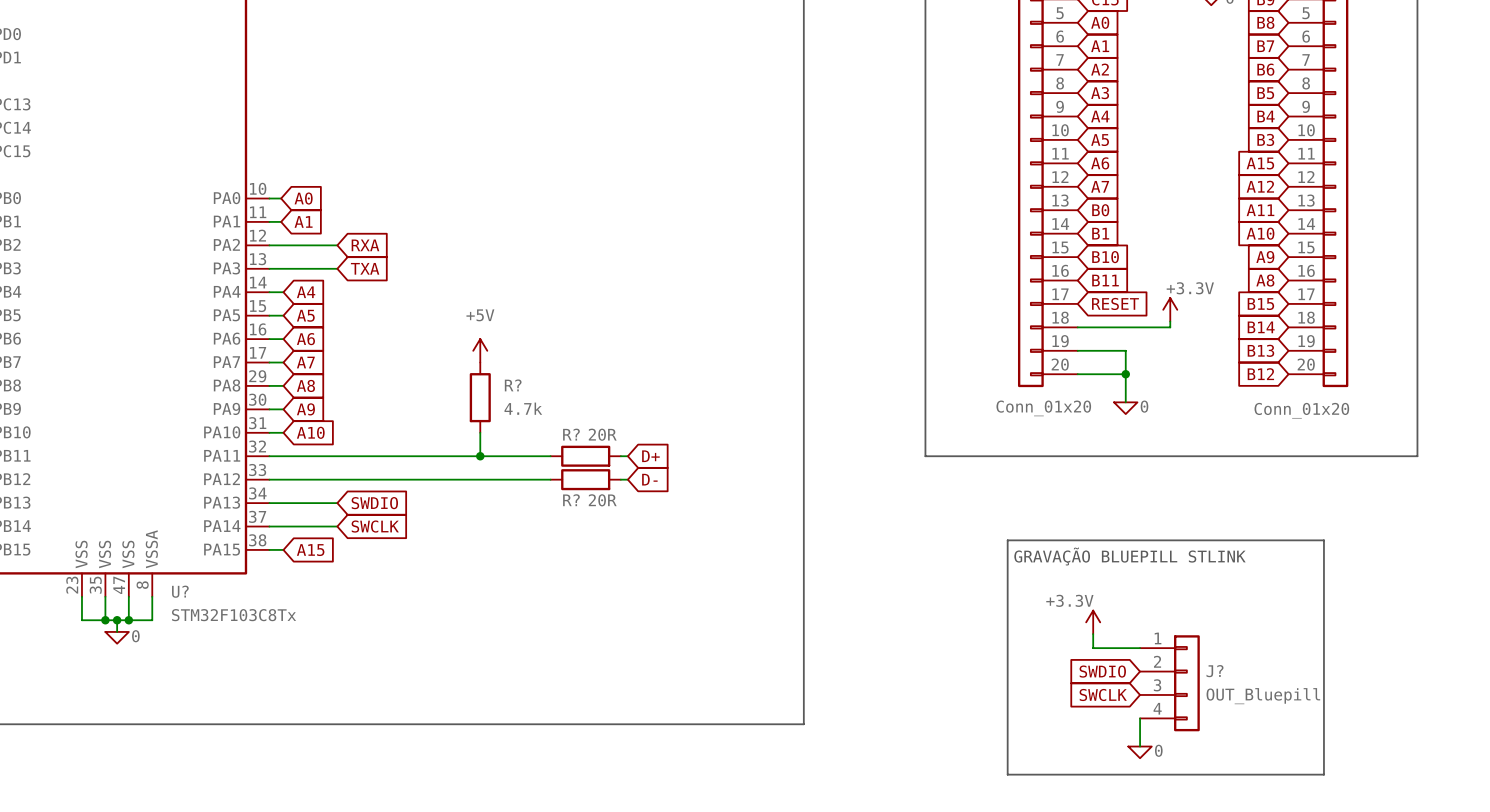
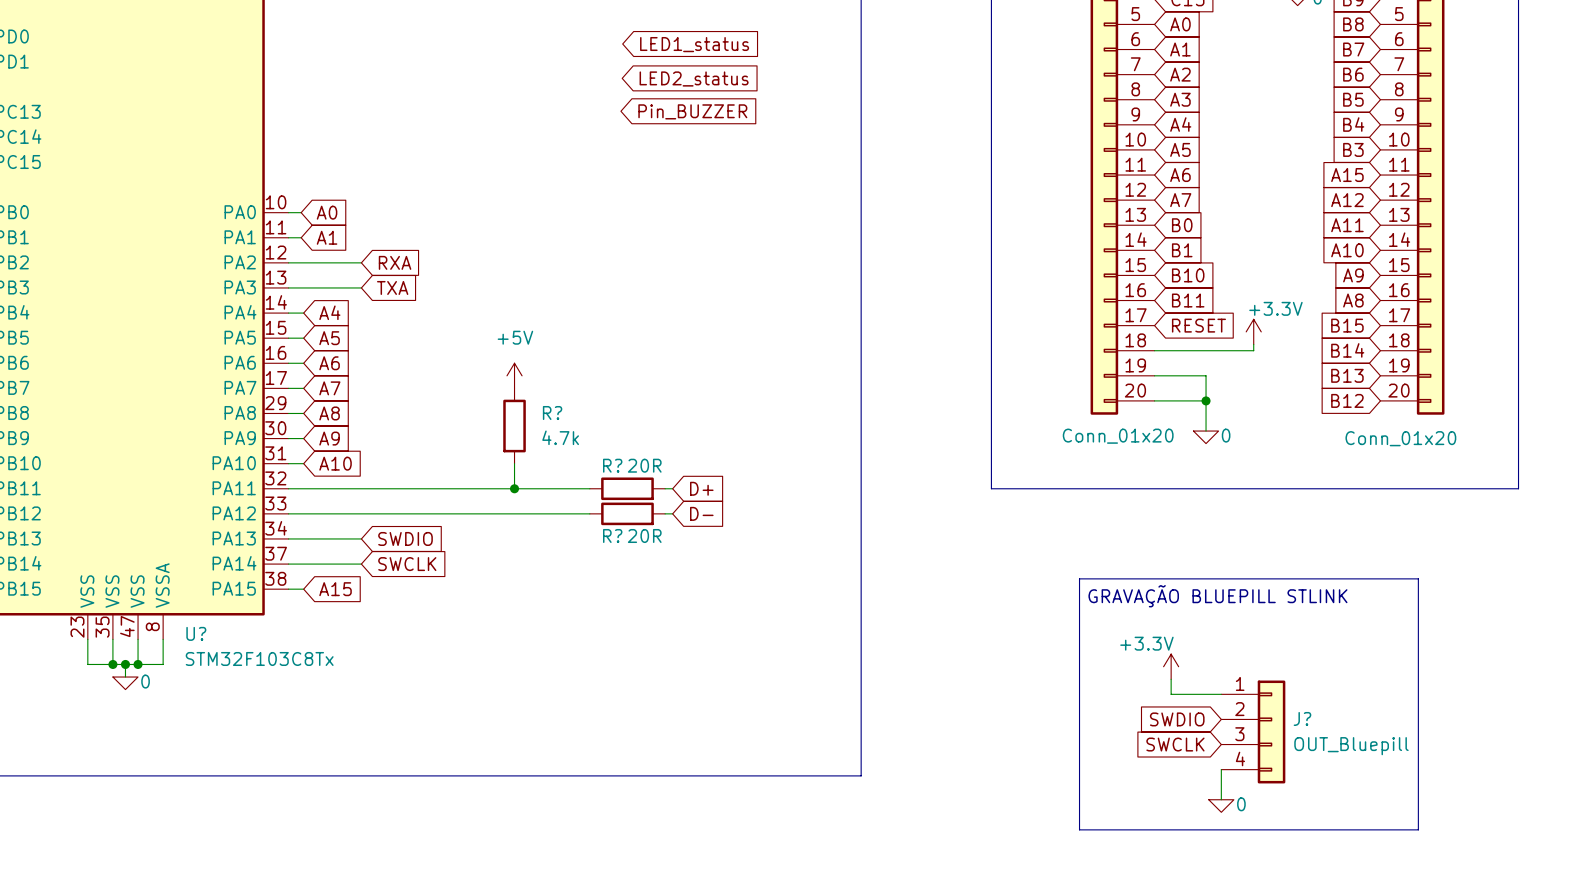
global label: none -> LED1_status (694, 44)
global label: none -> LED2_status (694, 78)
global label: none -> Pin_BUZZER (692, 111)

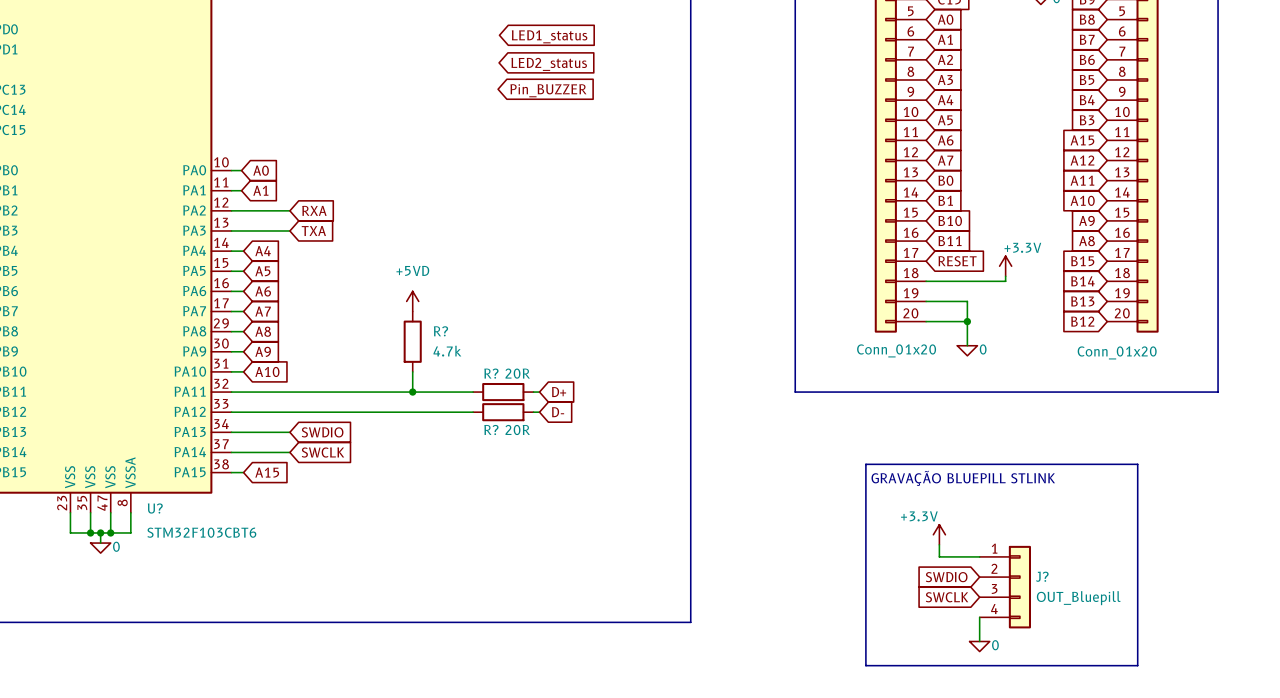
power symbol: +5V (514, 375) -> +5VD (412, 301)
U? value: STM32F103C8Tx (259, 658) -> STM32F103CBT6 (201, 532)

